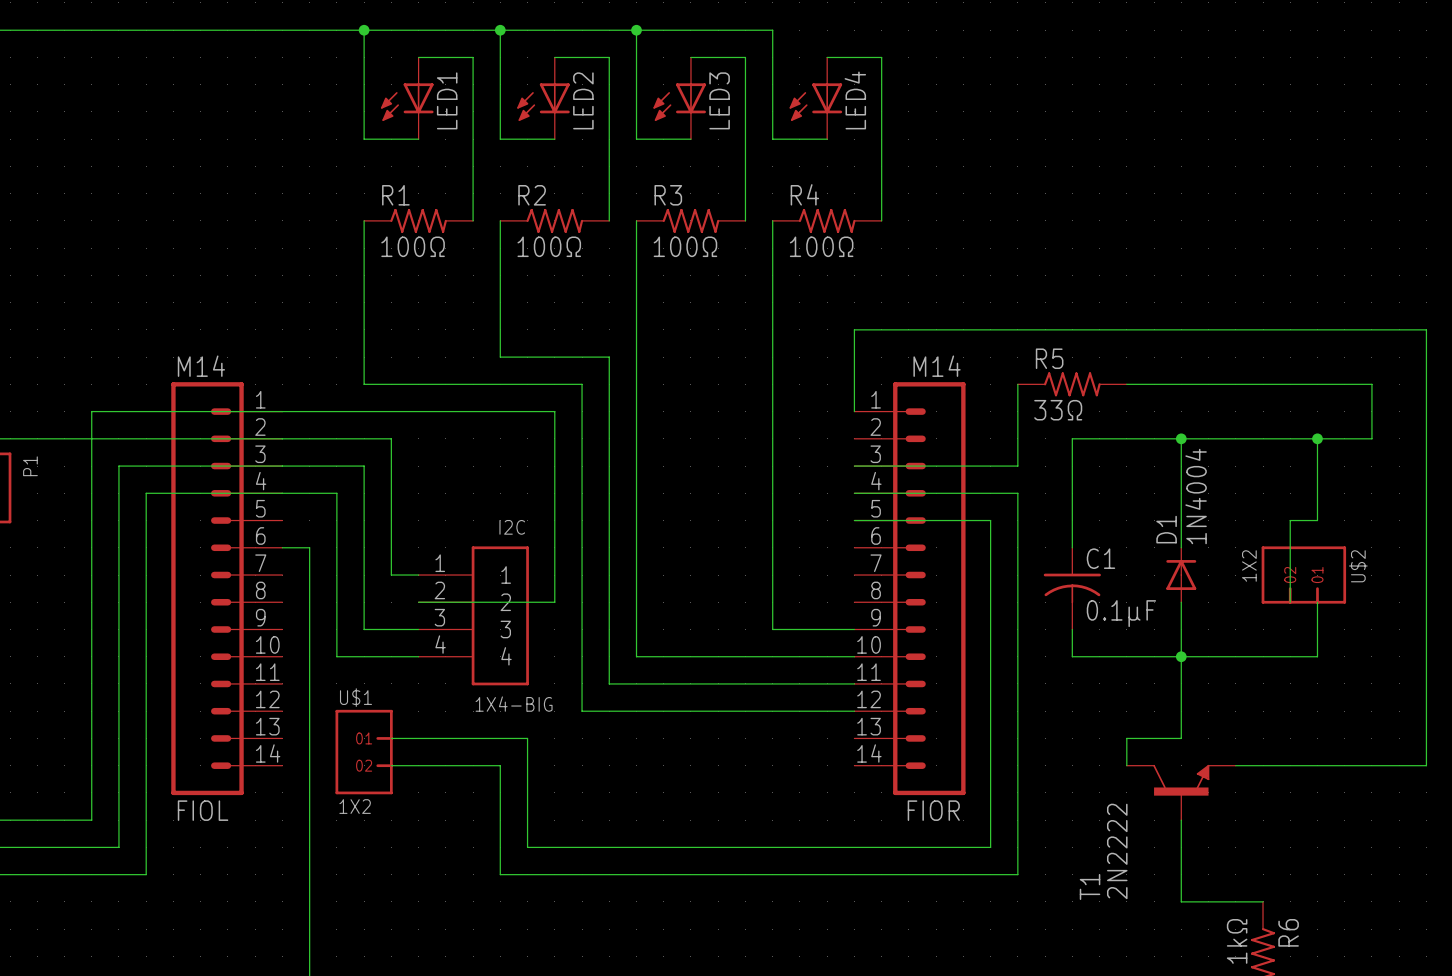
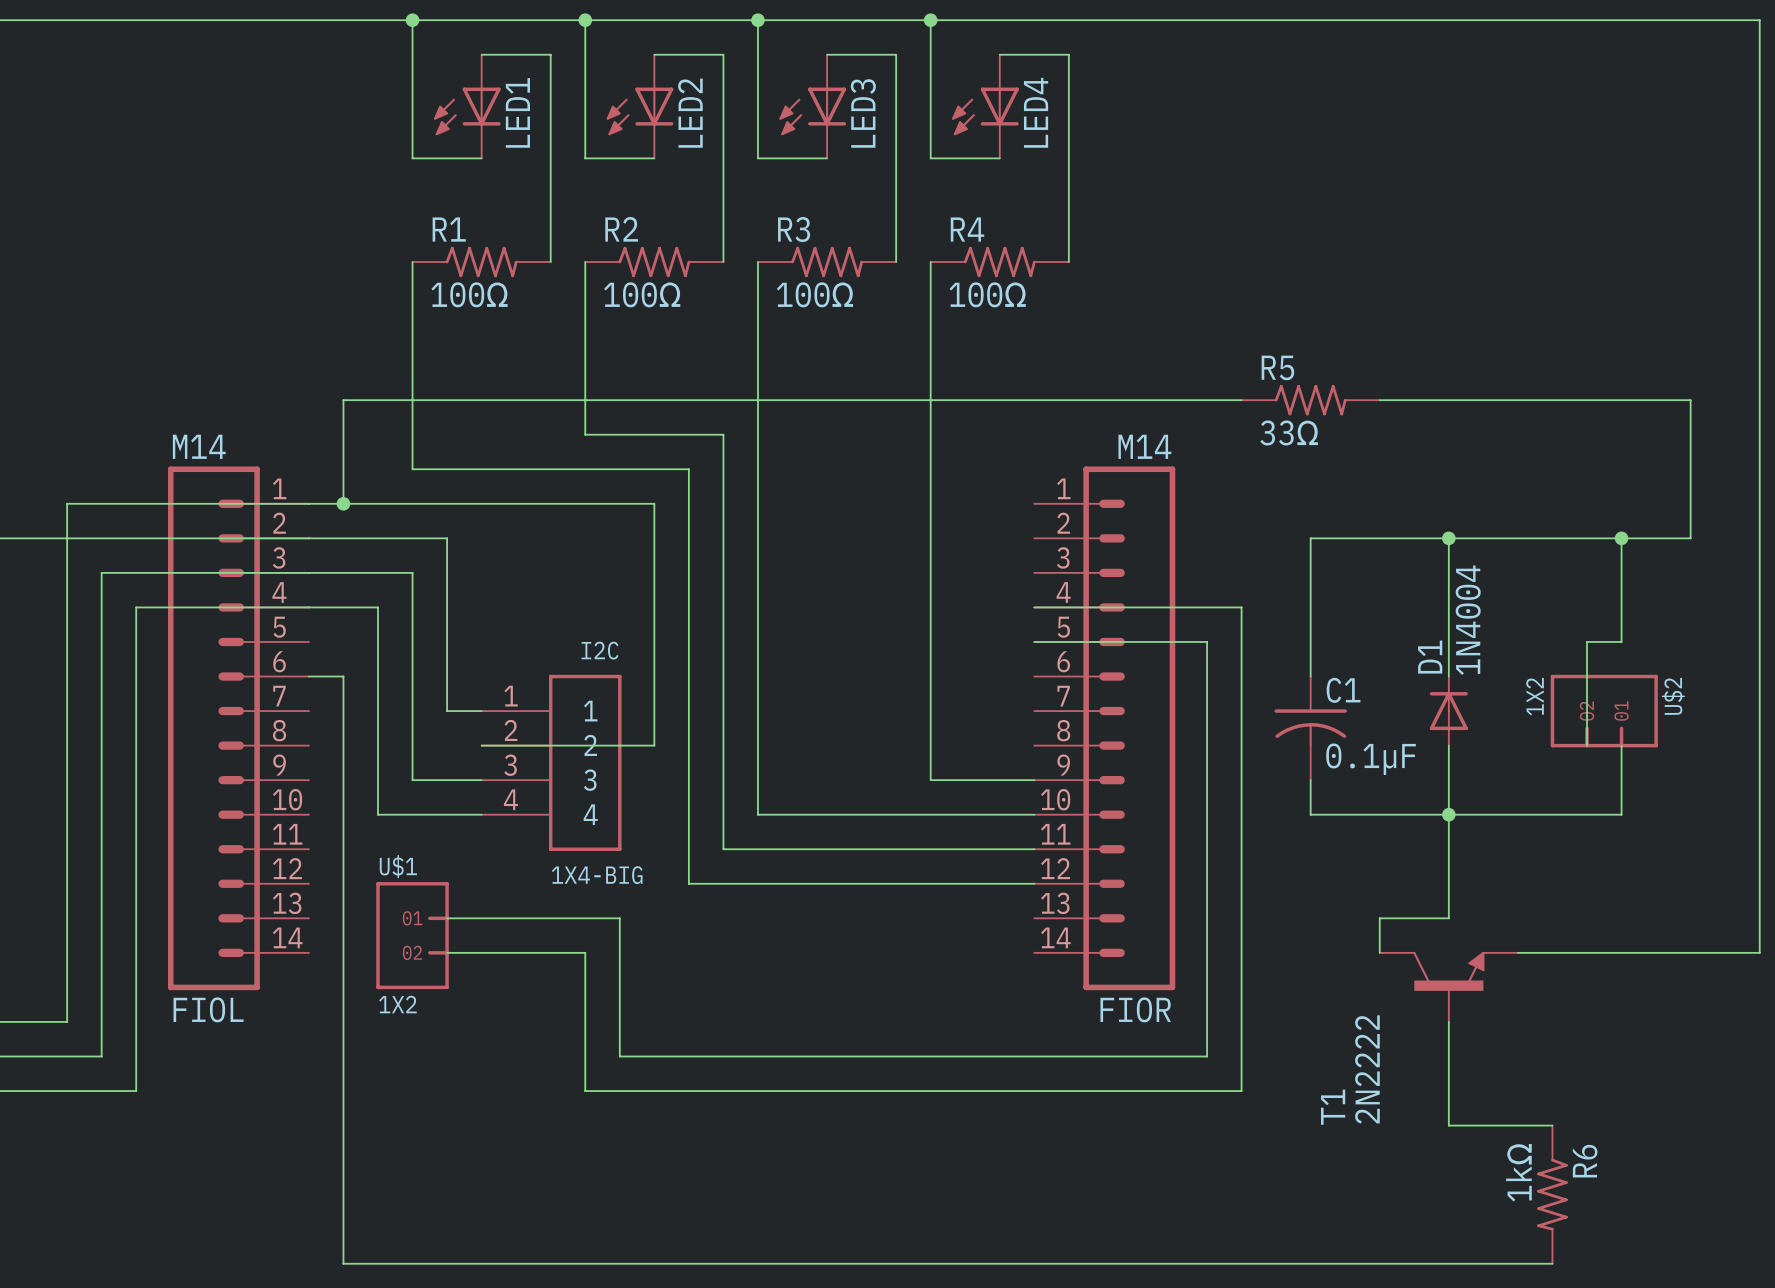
wire: none -> (930, 20) (1759, 20) (1759, 400)
junction: none -> (930, 20)
wire: (854, 329) (854, 411) -> (1034, 400) (343, 400) (343, 503)
wire: (1371, 329) (1426, 329) -> (1690, 400) (1690, 469)
wire: (1017, 384) (1017, 466) (854, 466) -> none
R5 position: (1072, 384) -> (1310, 400)
wire: (1126, 384) (1371, 384) -> none
junction: none -> (343, 503)

